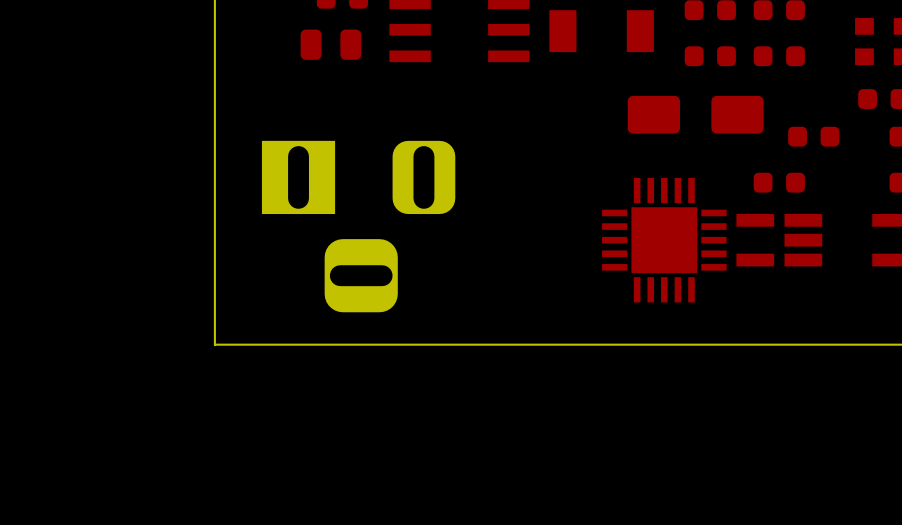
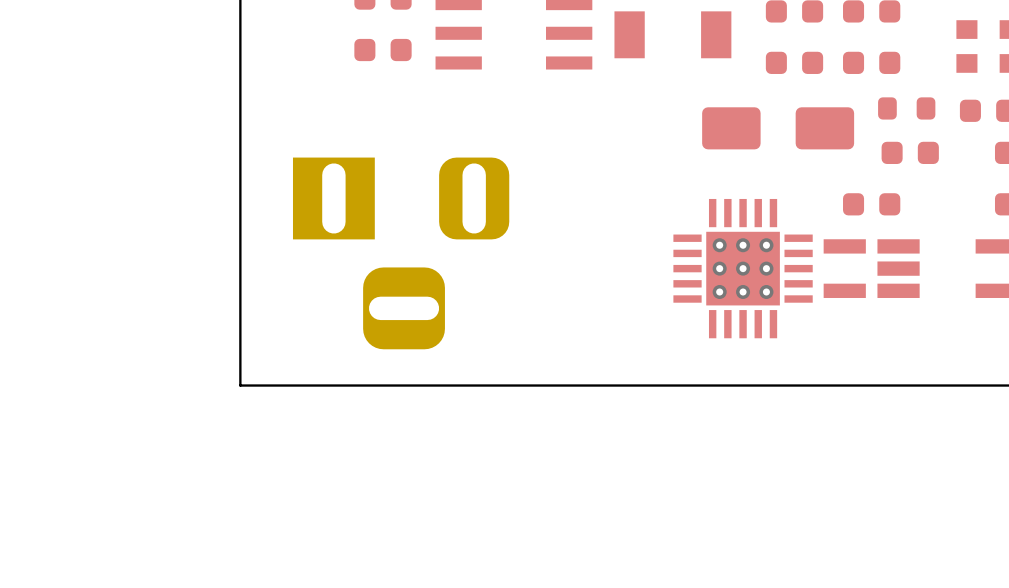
part footprint: [300, 29, 362, 60] -> [354, 38, 412, 62]
part: none -> (906, 108)
via: none -> (719, 245)
via: none -> (743, 245)
via: none -> (766, 245)
via: none -> (719, 268)
via: none -> (743, 268)
via: none -> (766, 268)
via: none -> (719, 292)
via: none -> (743, 292)
via: none -> (766, 292)

